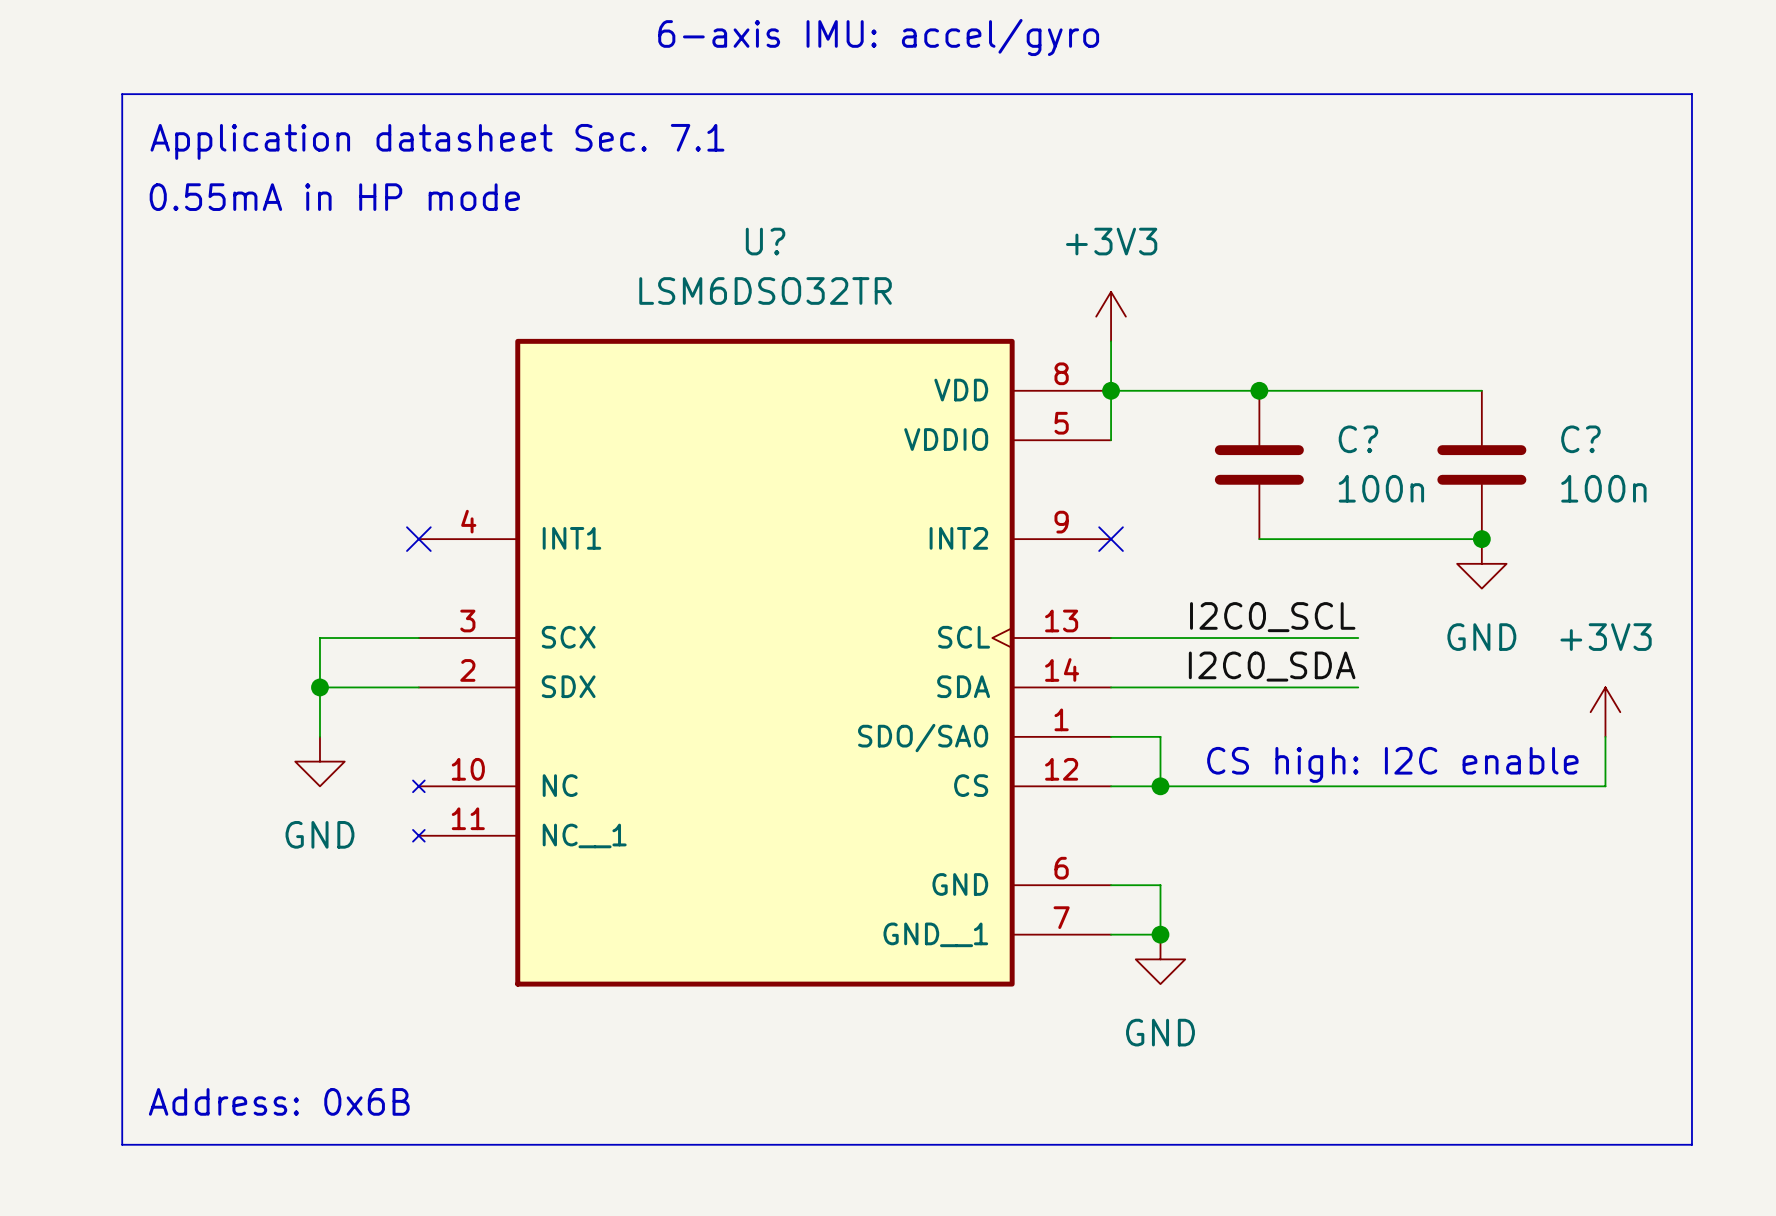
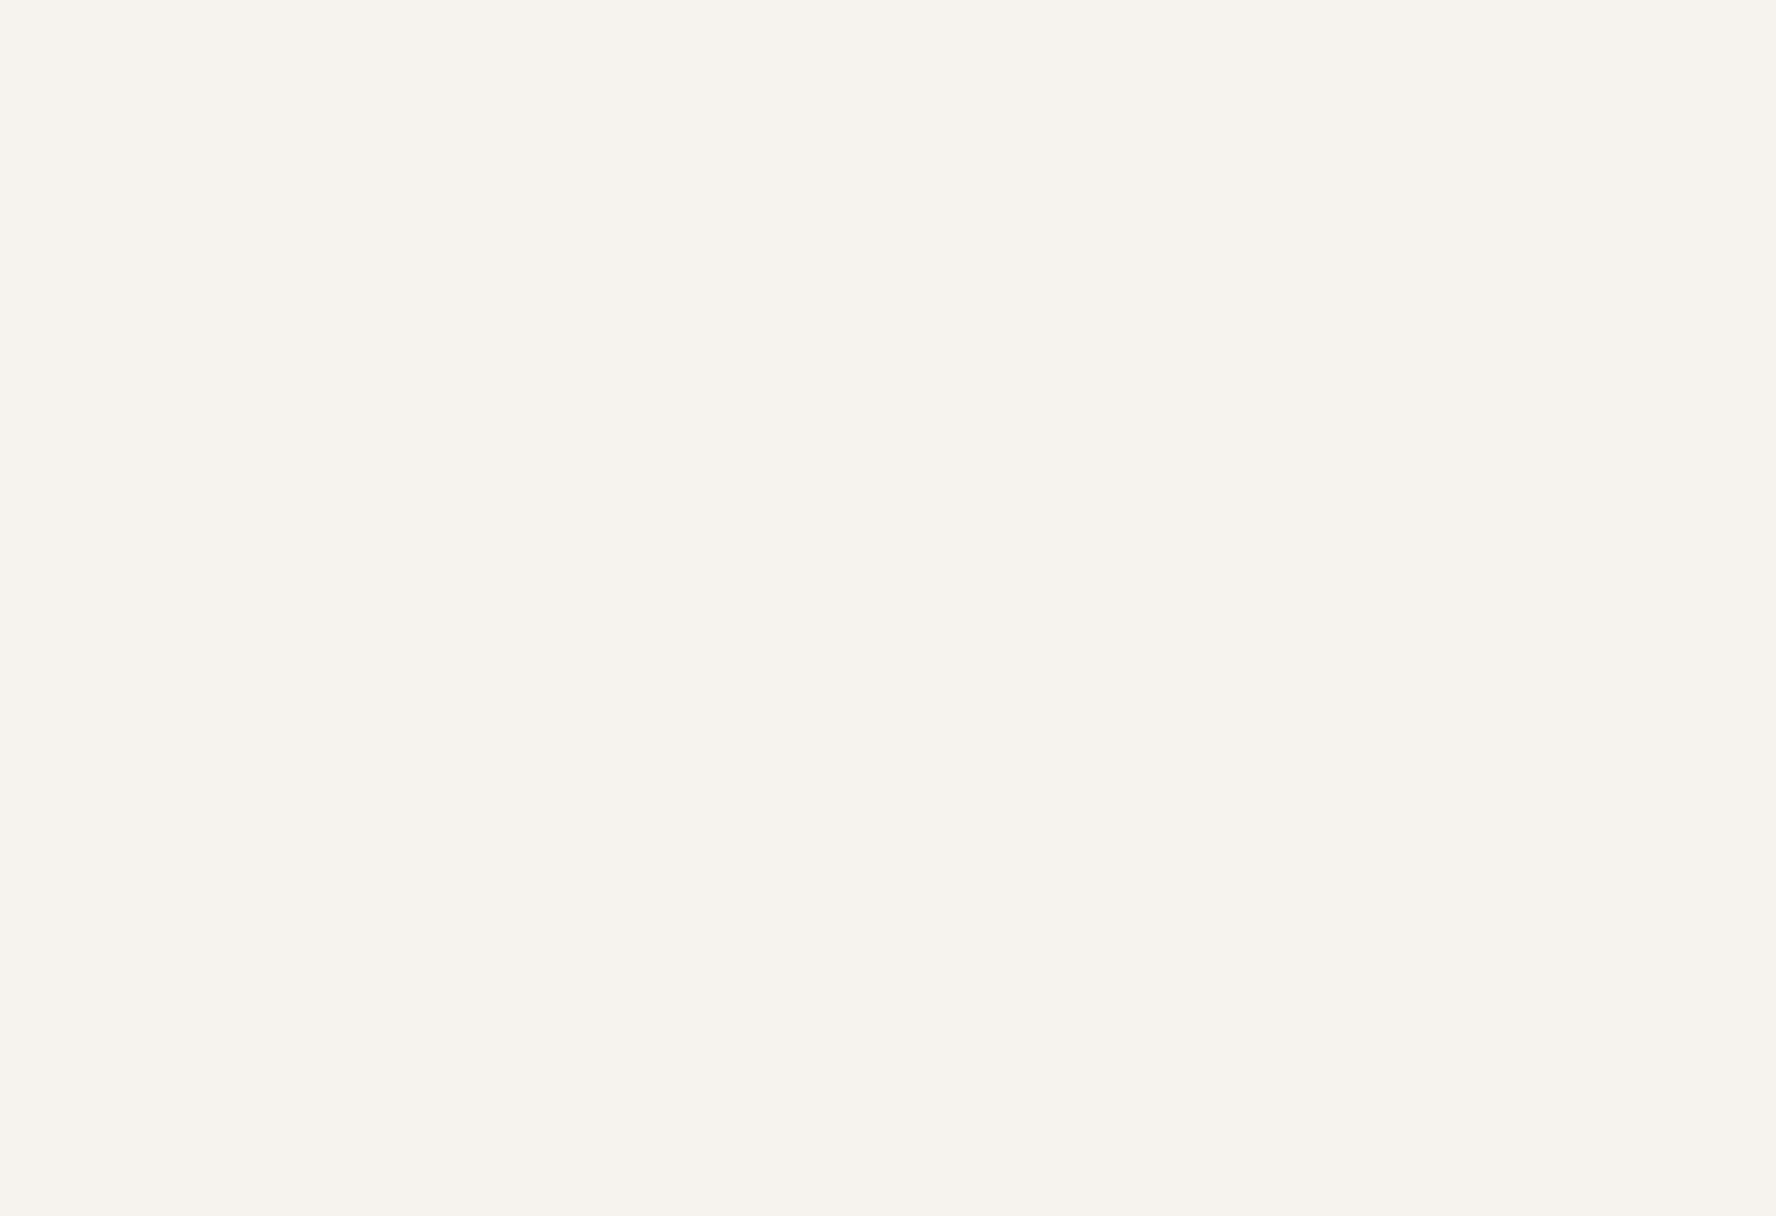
text: 6-axis IMU: accel/gyro (878, 37) -> none
line: (122, 94) (1691, 94) (1691, 1144) (122, 1144) (122, 94) -> none
text: Application datasheet Sec. 7.1 (437, 141) -> none
text: 0.55mA in HP mode (334, 197) -> none
power symbol: +3V3 (1111, 316) -> none
wire: (1111, 341) (1111, 440) -> none
wire: (1111, 390) (1481, 390) -> none
junction: (1111, 390) -> none
junction: (1259, 390) -> none
C?: 100n (1259, 464) -> none
C?: 100n (1481, 464) -> none
no-connect mark: (418, 539) -> none
no-connect mark: (1111, 539) -> none
wire: (1259, 539) (1481, 539) -> none
junction: (1481, 539) -> none
power symbol: GND (1481, 563) -> none
label: I2C0_SCL (1272, 617) -> none
wire: (418, 638) (319, 638) (319, 736) -> none
wire: (1111, 638) (1358, 638) -> none
U?: LSM6DSO32TR (762, 662) -> none
label: I2C0_SDA (1272, 666) -> none
wire: (319, 687) (418, 687) -> none
junction: (319, 687) -> none
wire: (1111, 687) (1358, 687) -> none
power symbol: +3V3 (1605, 712) -> none
wire: (1111, 736) (1160, 736) (1160, 786) -> none
wire: (1605, 736) (1605, 786) (1111, 786) -> none
power symbol: GND (319, 761) -> none
text: CS high: I2C enable (1392, 764) -> none
junction: (1160, 786) -> none
wire: (1111, 885) (1160, 885) (1160, 934) (1111, 934) -> none
junction: (1160, 934) -> none
power symbol: GND (1160, 959) -> none
text: Address: 0x6B (279, 1101) -> none

